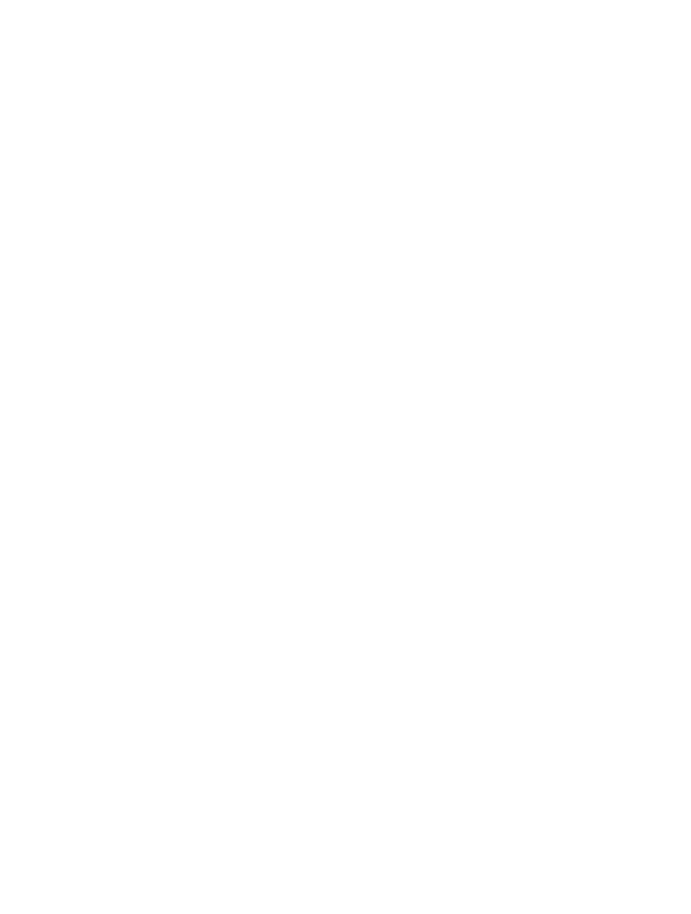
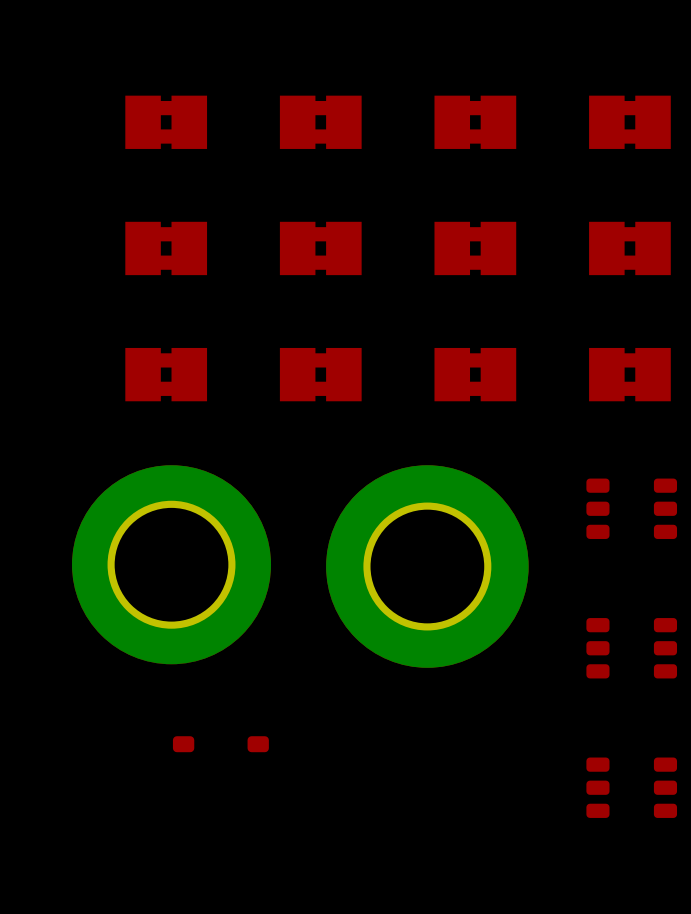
part: none -> (166, 122)
part: none -> (320, 122)
part: none -> (475, 122)
part: none -> (629, 122)
part: none -> (166, 248)
part: none -> (320, 248)
part: none -> (475, 248)
part: none -> (629, 248)
part: none -> (166, 374)
part: none -> (320, 374)
part: none -> (475, 374)
part: none -> (629, 374)
part: none -> (631, 508)
part: none -> (171, 564)
part: none -> (427, 566)
part: none -> (631, 648)
part: none -> (220, 744)
part: none -> (631, 787)

